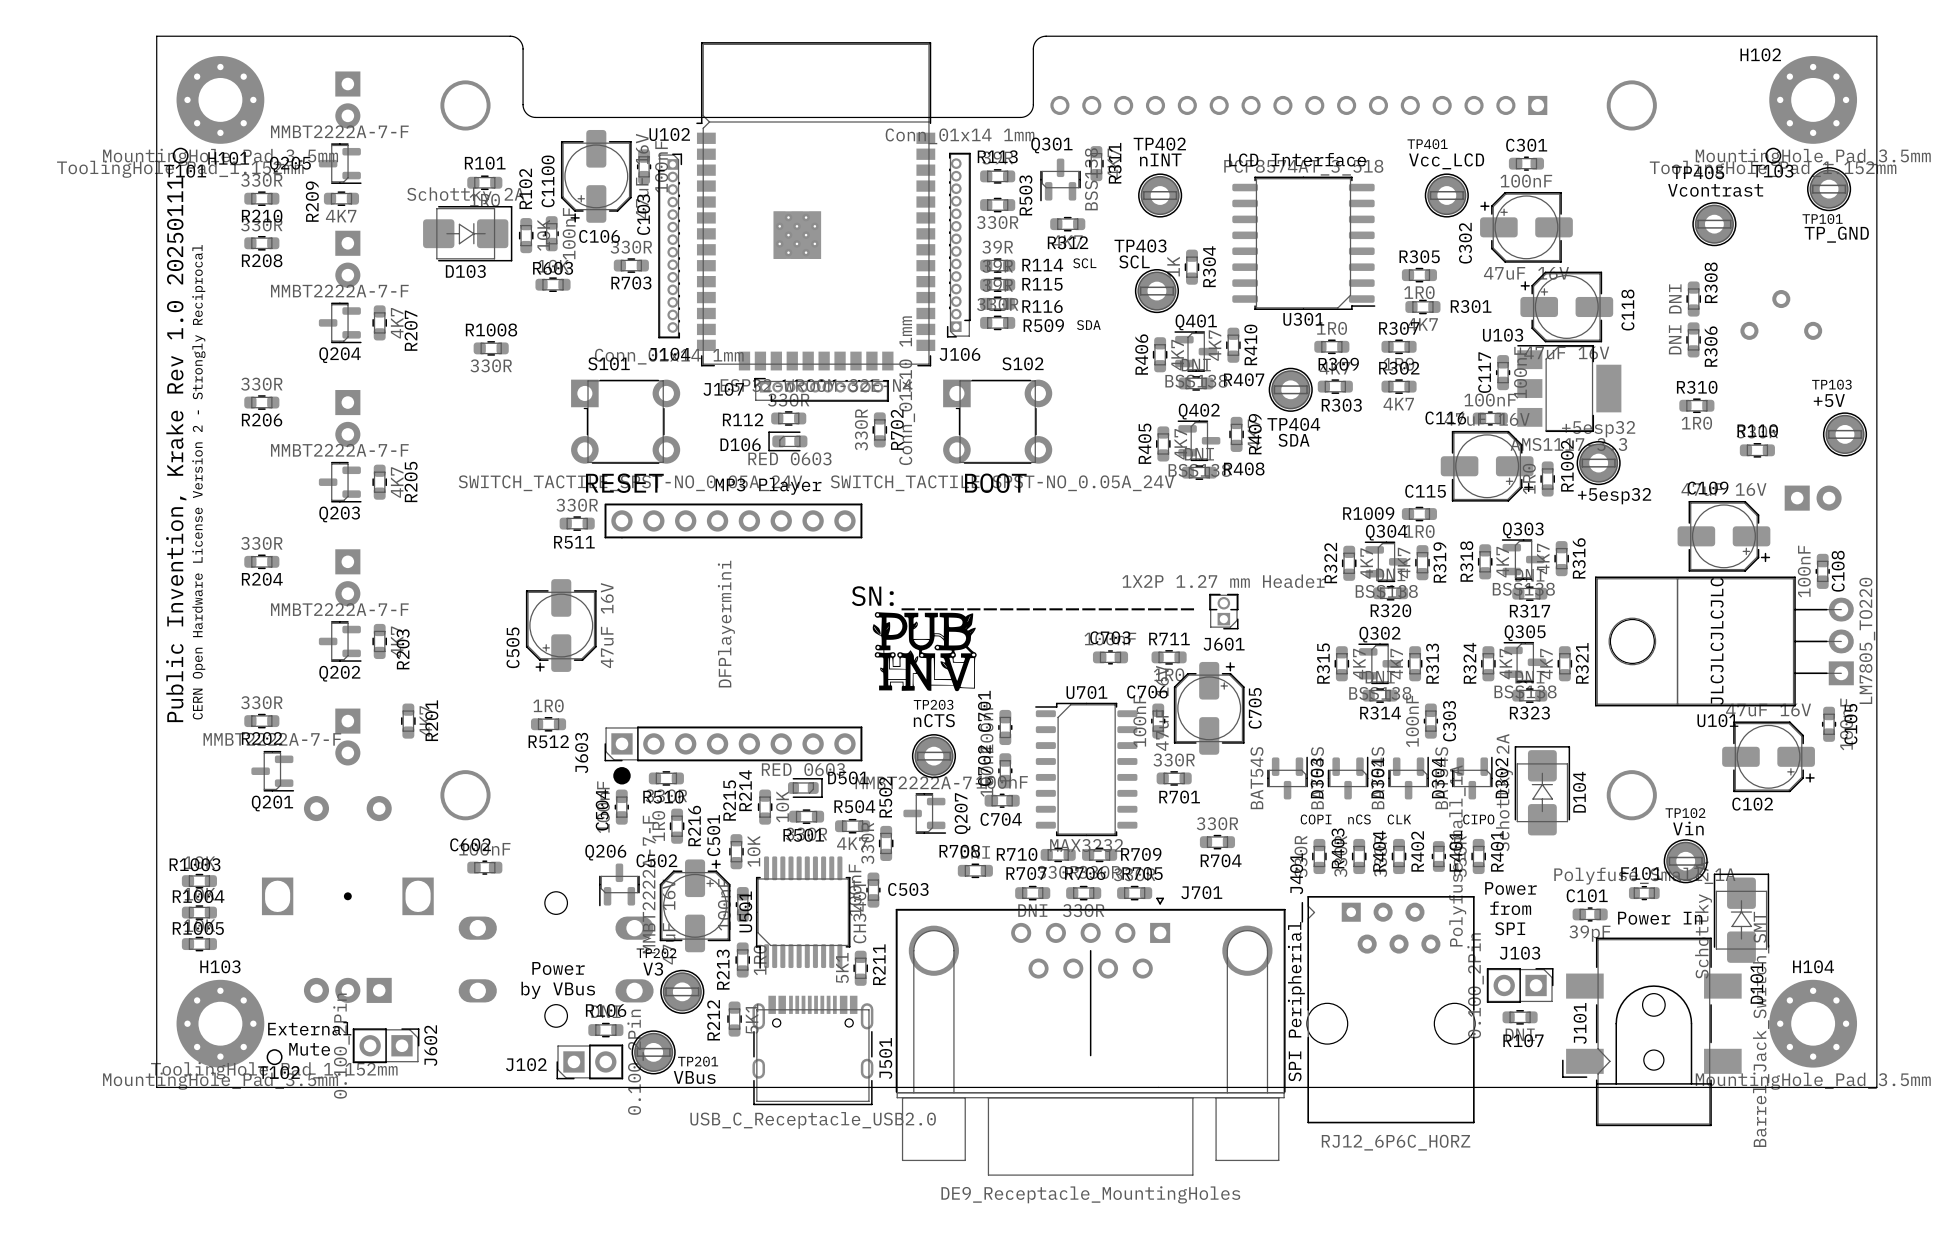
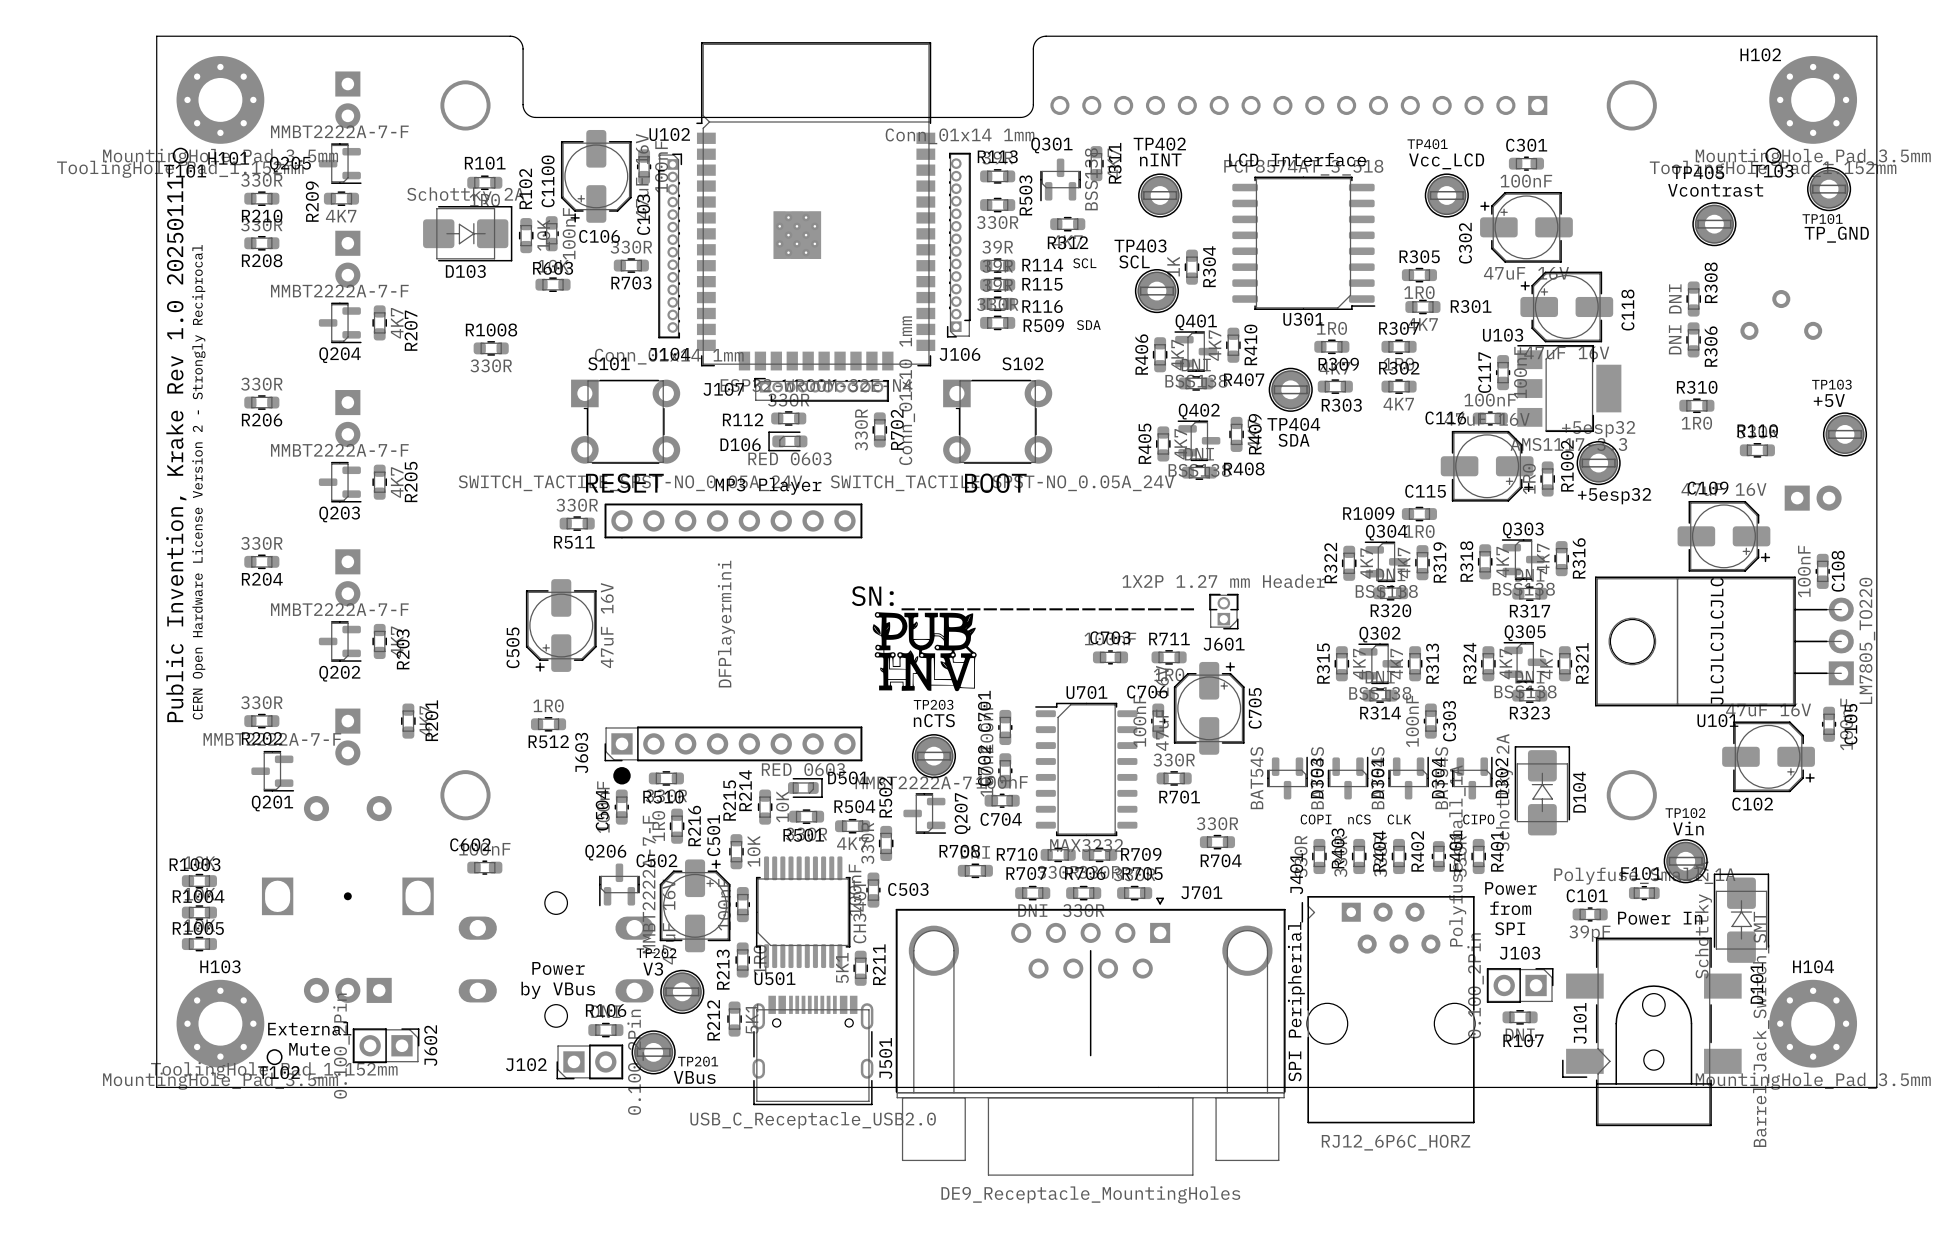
U501 name rotation: 0° (745, 911) -> 90° clockwise (774, 978)
U501 name position: U501 (745, 911) -> U501 (774, 978)

